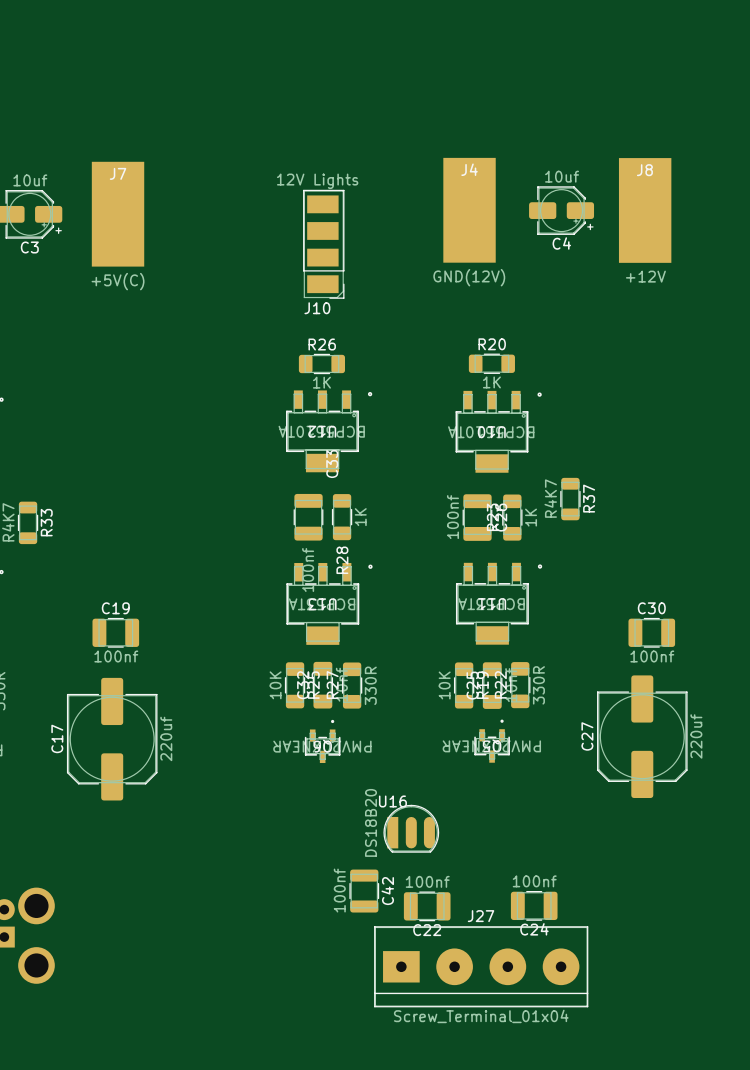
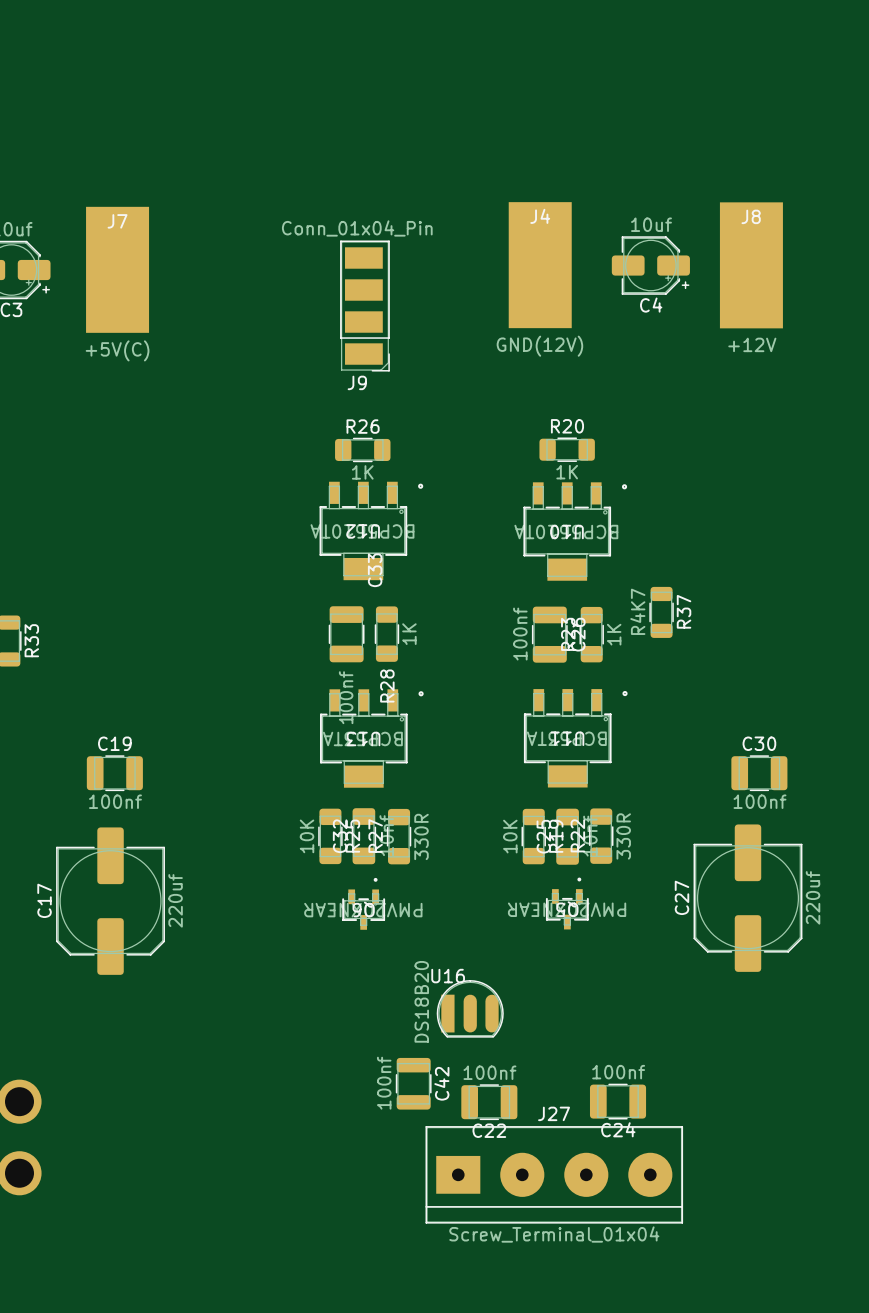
J10 value: 12V Lights (317, 181) -> Conn_01x04_Pin (357, 228)
J10 name: J10 (317, 308) -> J9 (357, 382)

